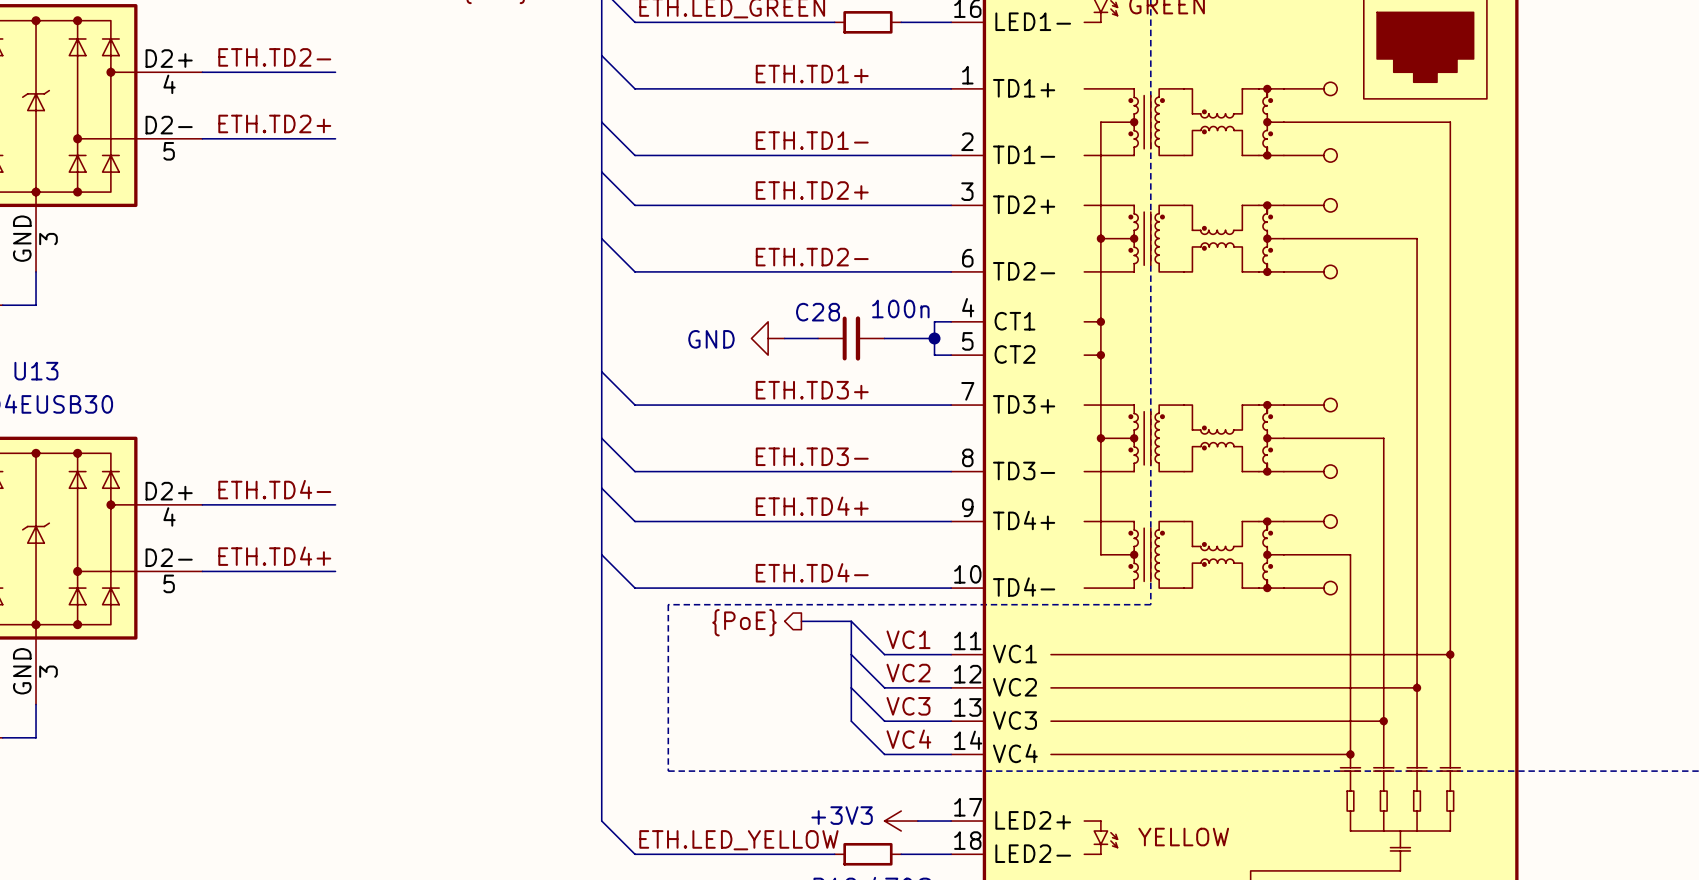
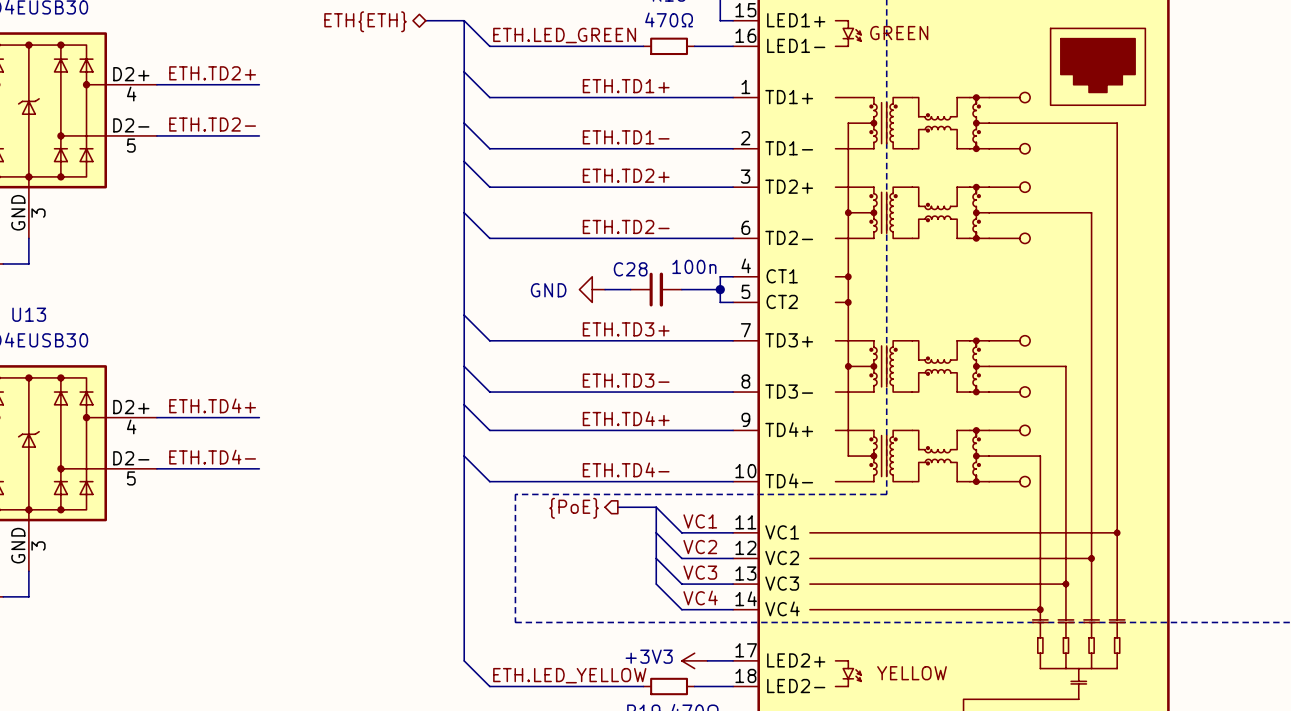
label: ETH.TD2- (274, 57) -> ETH.TD2+ (212, 73)
label: ETH.TD2+ (274, 123) -> ETH.TD2- (212, 124)
label: ETH.TD4- (274, 489) -> ETH.TD4+ (212, 405)
label: ETH.TD4+ (274, 556) -> ETH.TD4- (212, 457)

